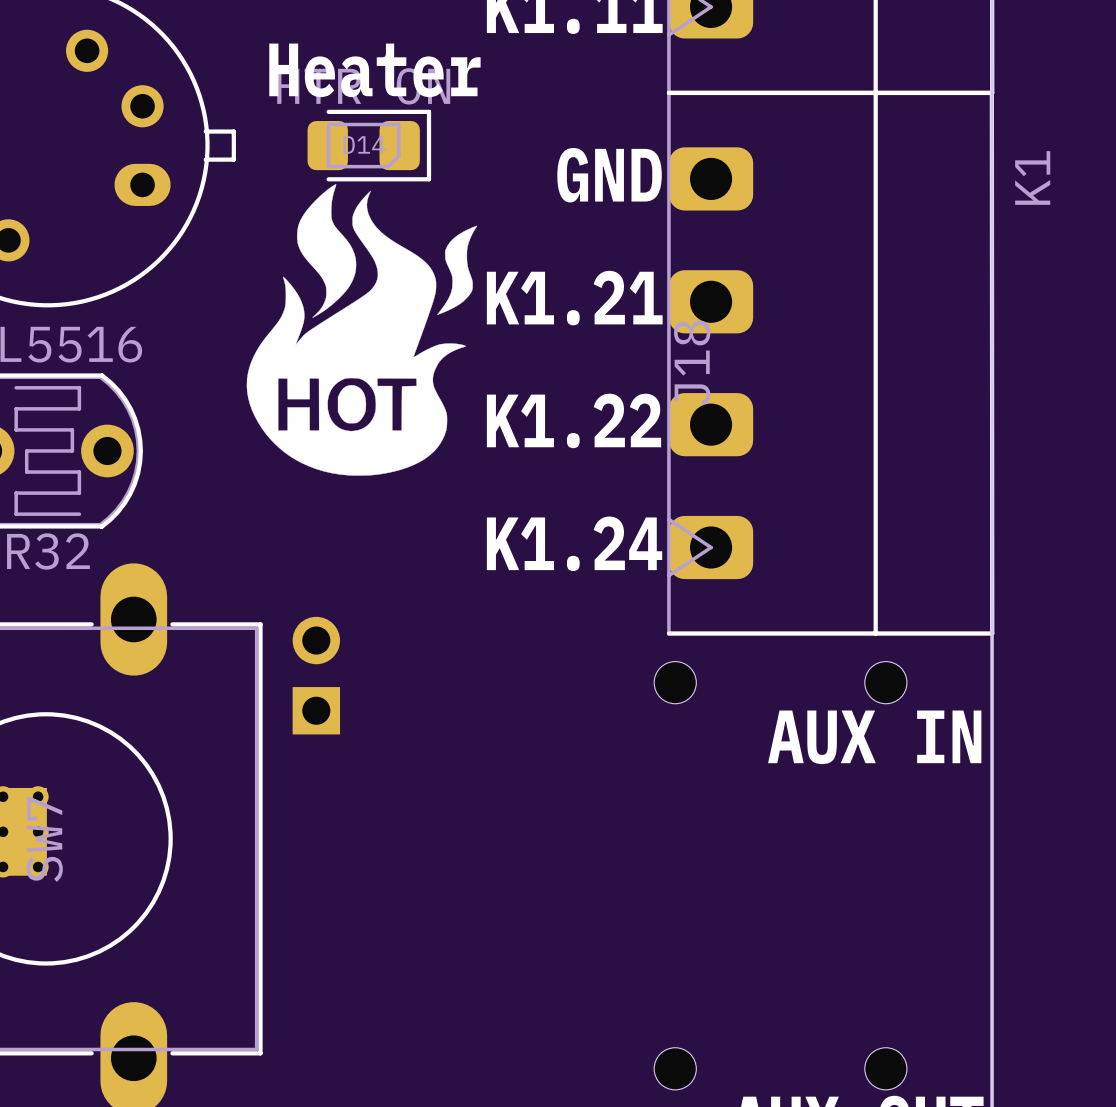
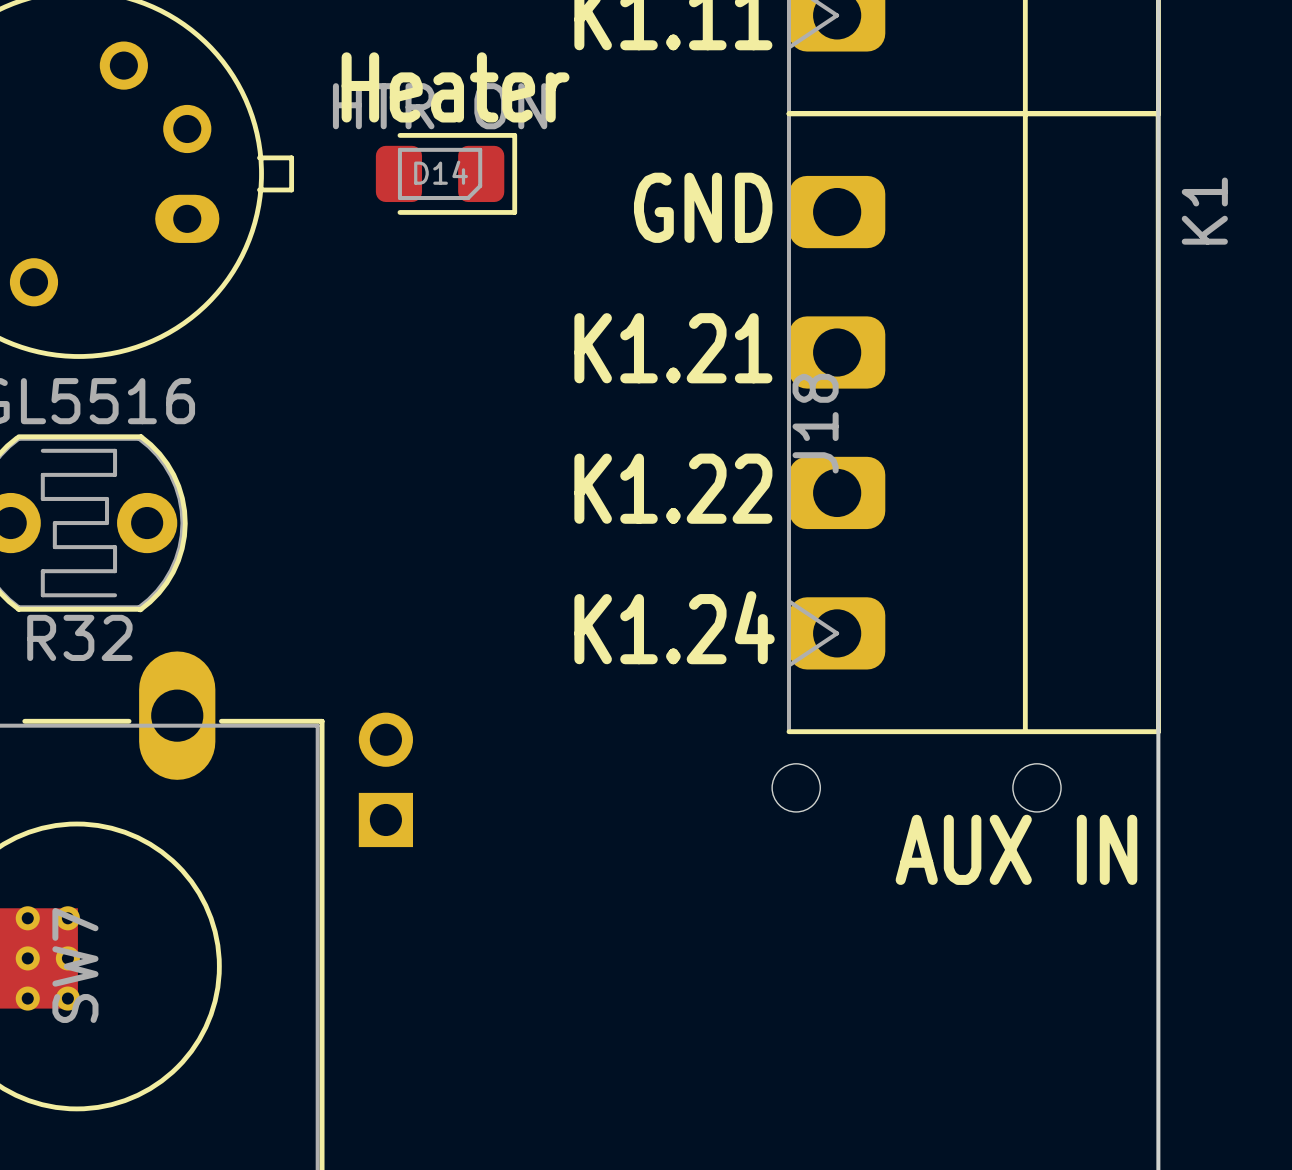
drawing: [246, 184, 478, 476] -> none

